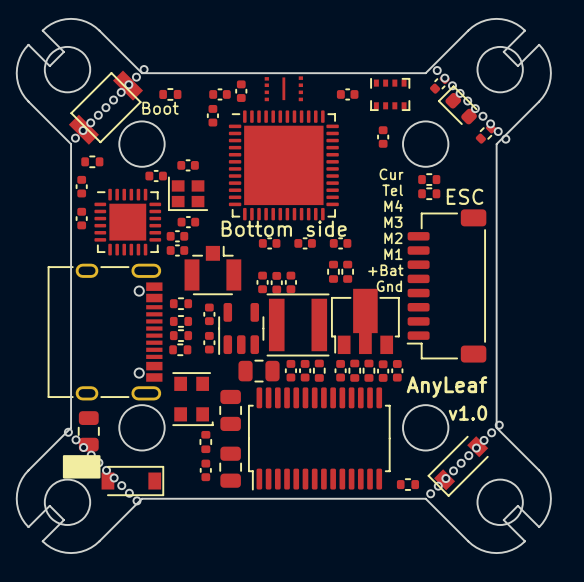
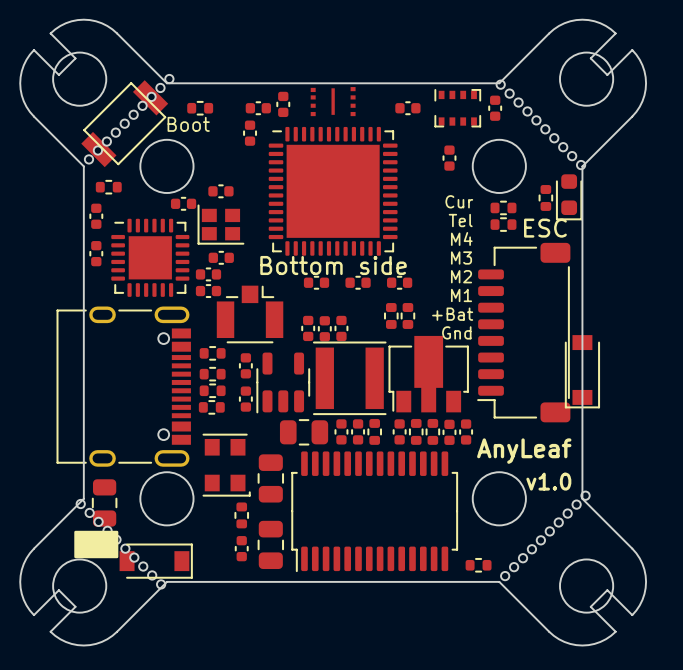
part: (439, 83) -> none
part footprint: [438, 85, 478, 125] -> [496, 80, 586, 170]
part: none -> (495, 108)
part: (471, 104) -> none
part: (485, 133) -> none
part: none -> (569, 197)
part: none -> (545, 197)
part: none -> (582, 371)
part: (458, 466) -> none

